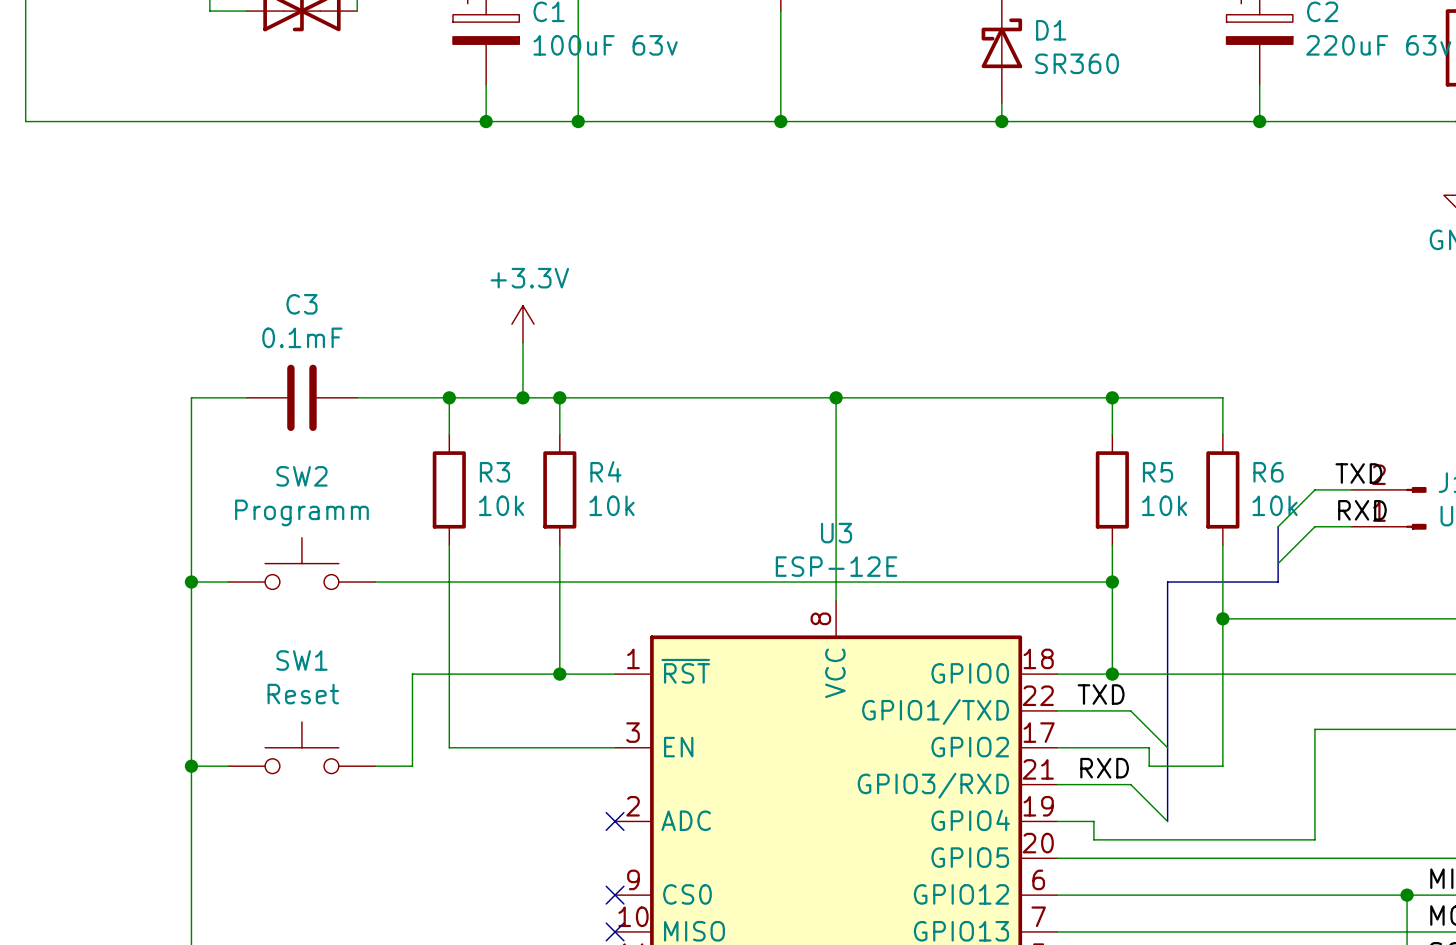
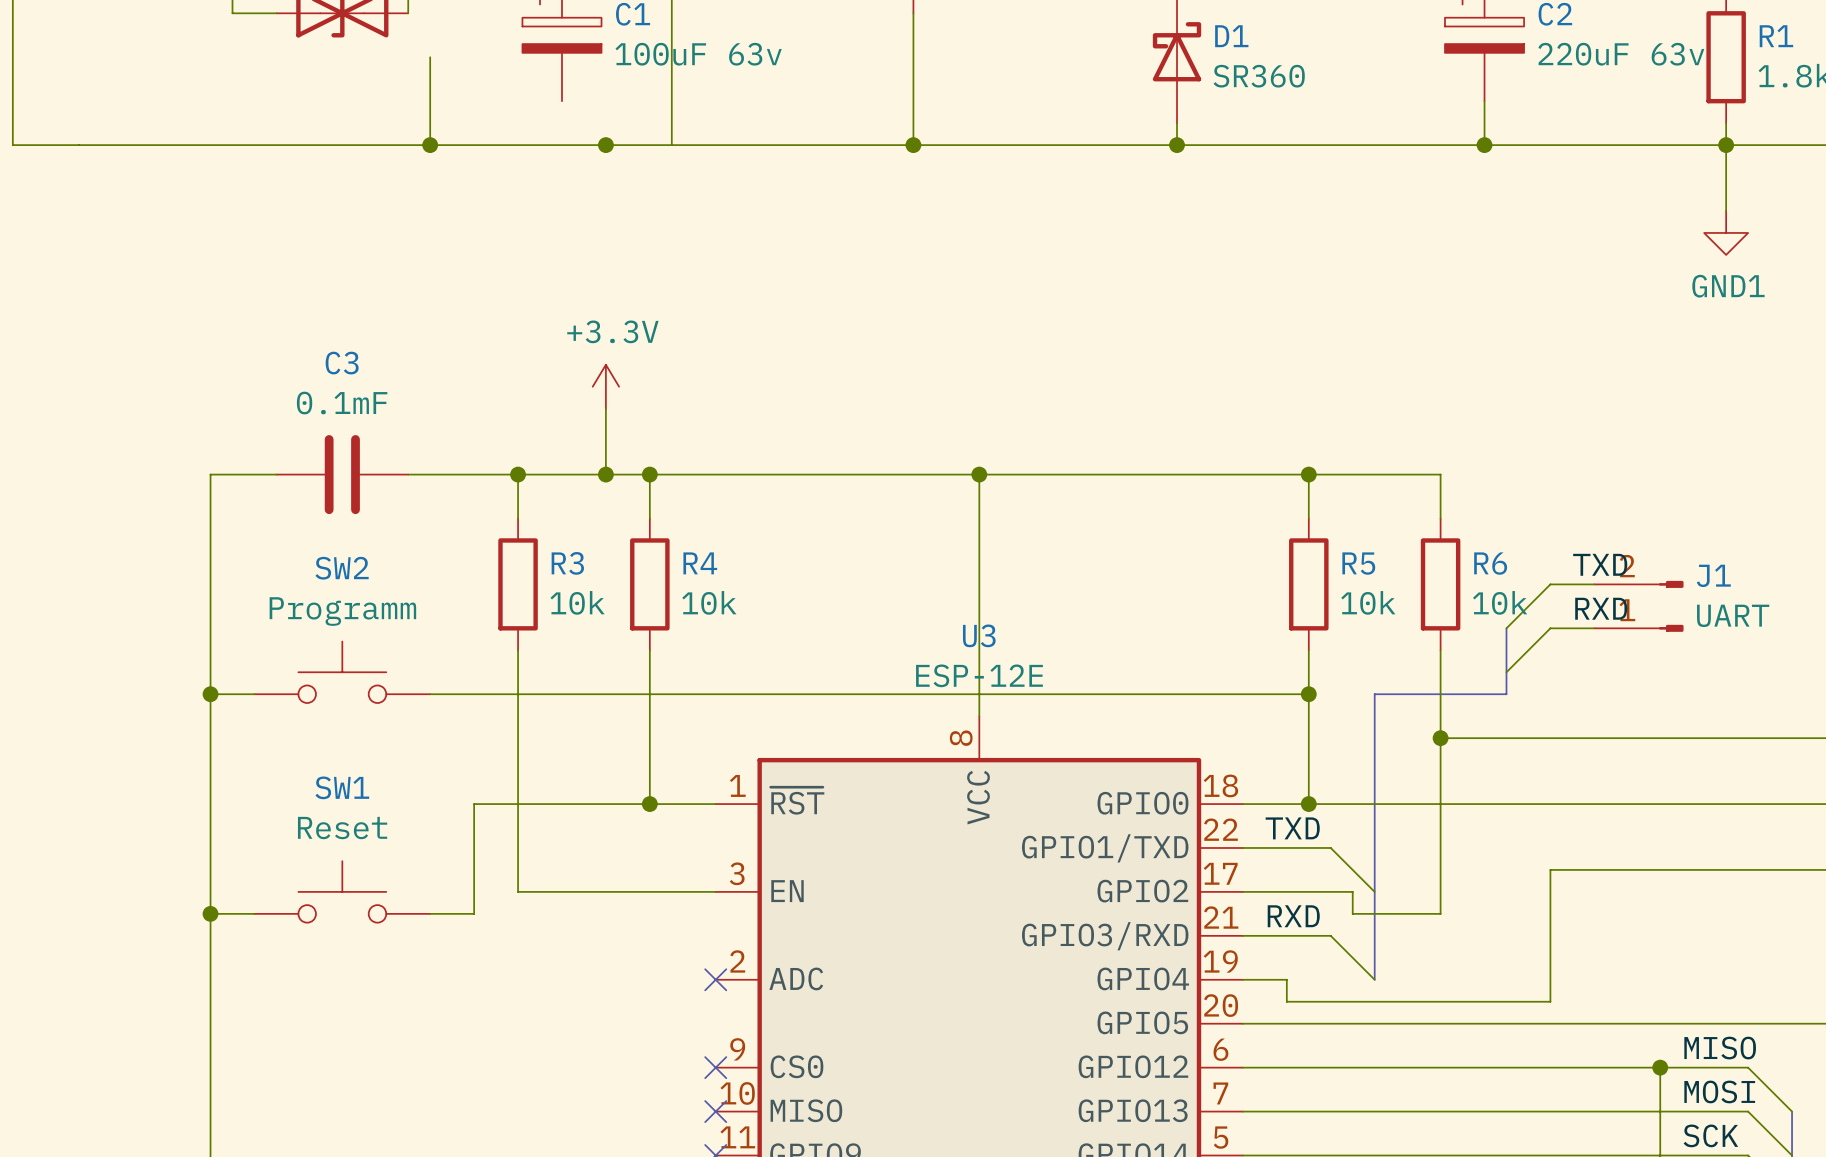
wire: none -> (430, 57) (430, 145)
wire: (486, 84) (486, 121) -> none
junction: none -> (430, 145)
junction: (486, 121) -> none
junction: none -> (605, 145)
junction: (578, 121) -> none

